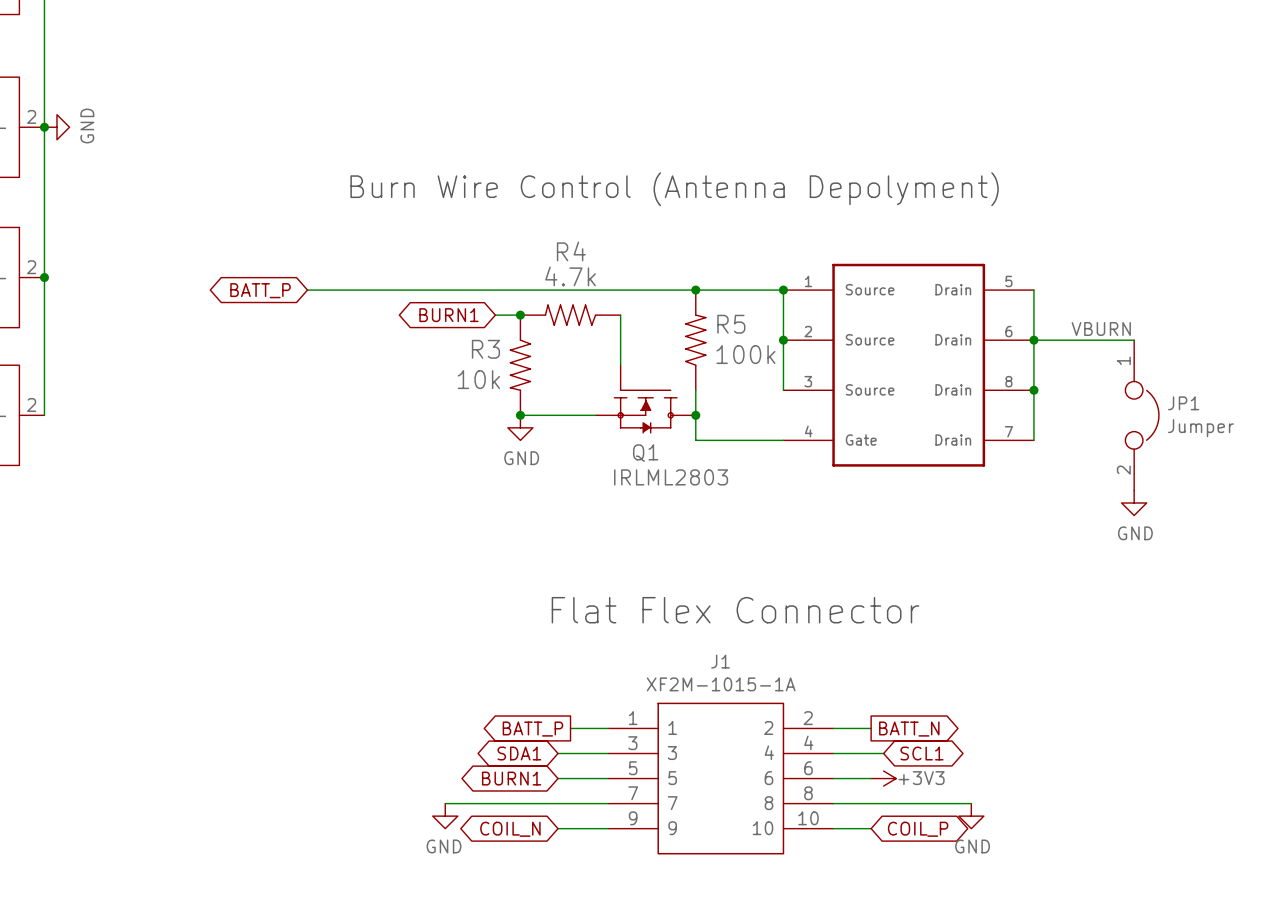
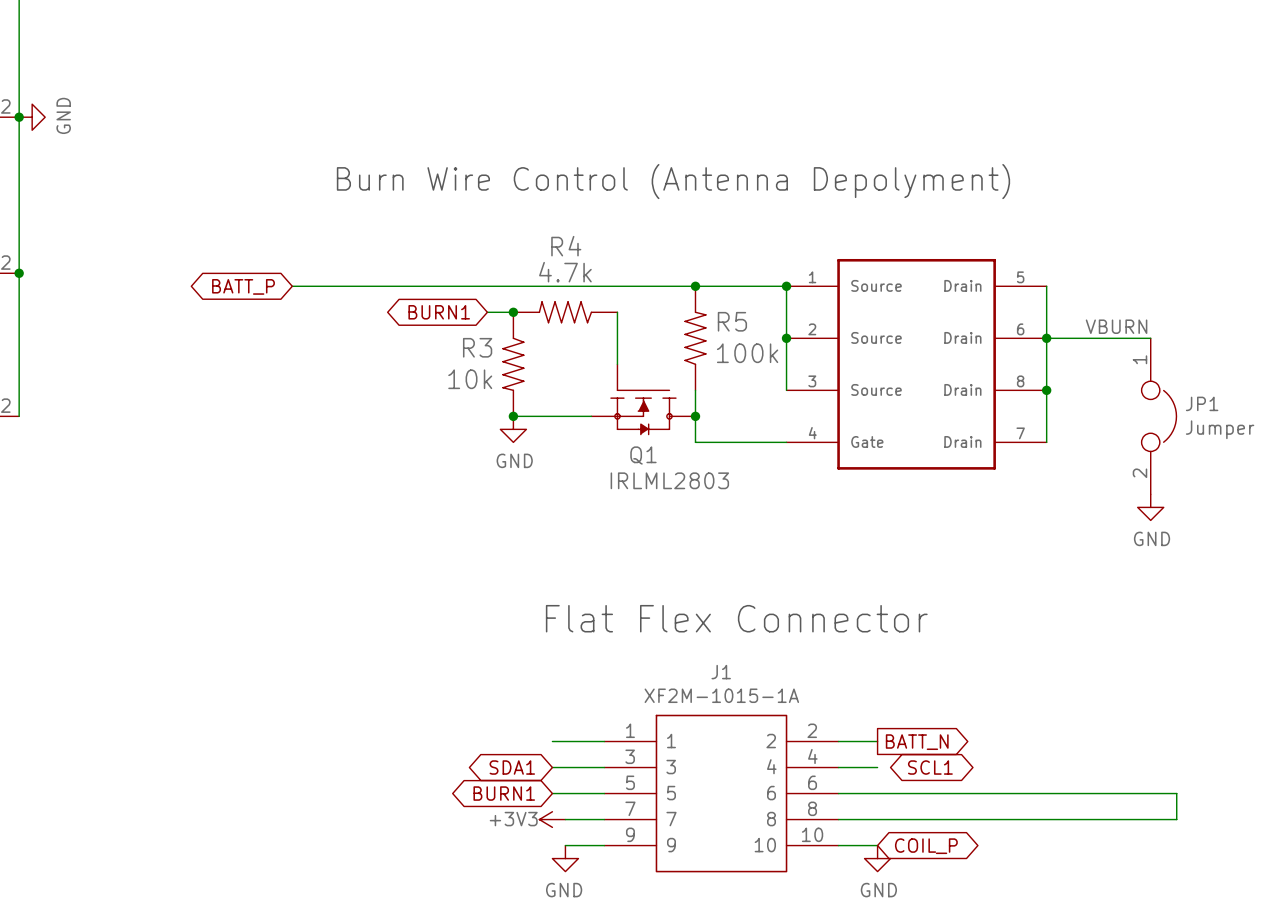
global label: BATT_P (532, 729) -> none
wire: (871, 753) (883, 753) -> none
wire: none -> (877, 793) (1176, 793) (1176, 819) (981, 819)
power symbol: +3V3 (883, 778) -> none
wire: (445, 803) (570, 803) -> none
power symbol: none -> +3V3 (552, 819)
power symbol position: GND (445, 816) -> GND (565, 858)
power symbol position: GND (971, 816) -> GND (877, 858)
wire: (558, 828) (570, 828) -> (552, 741) (565, 741)
global label: COIL_N (510, 829) -> none

